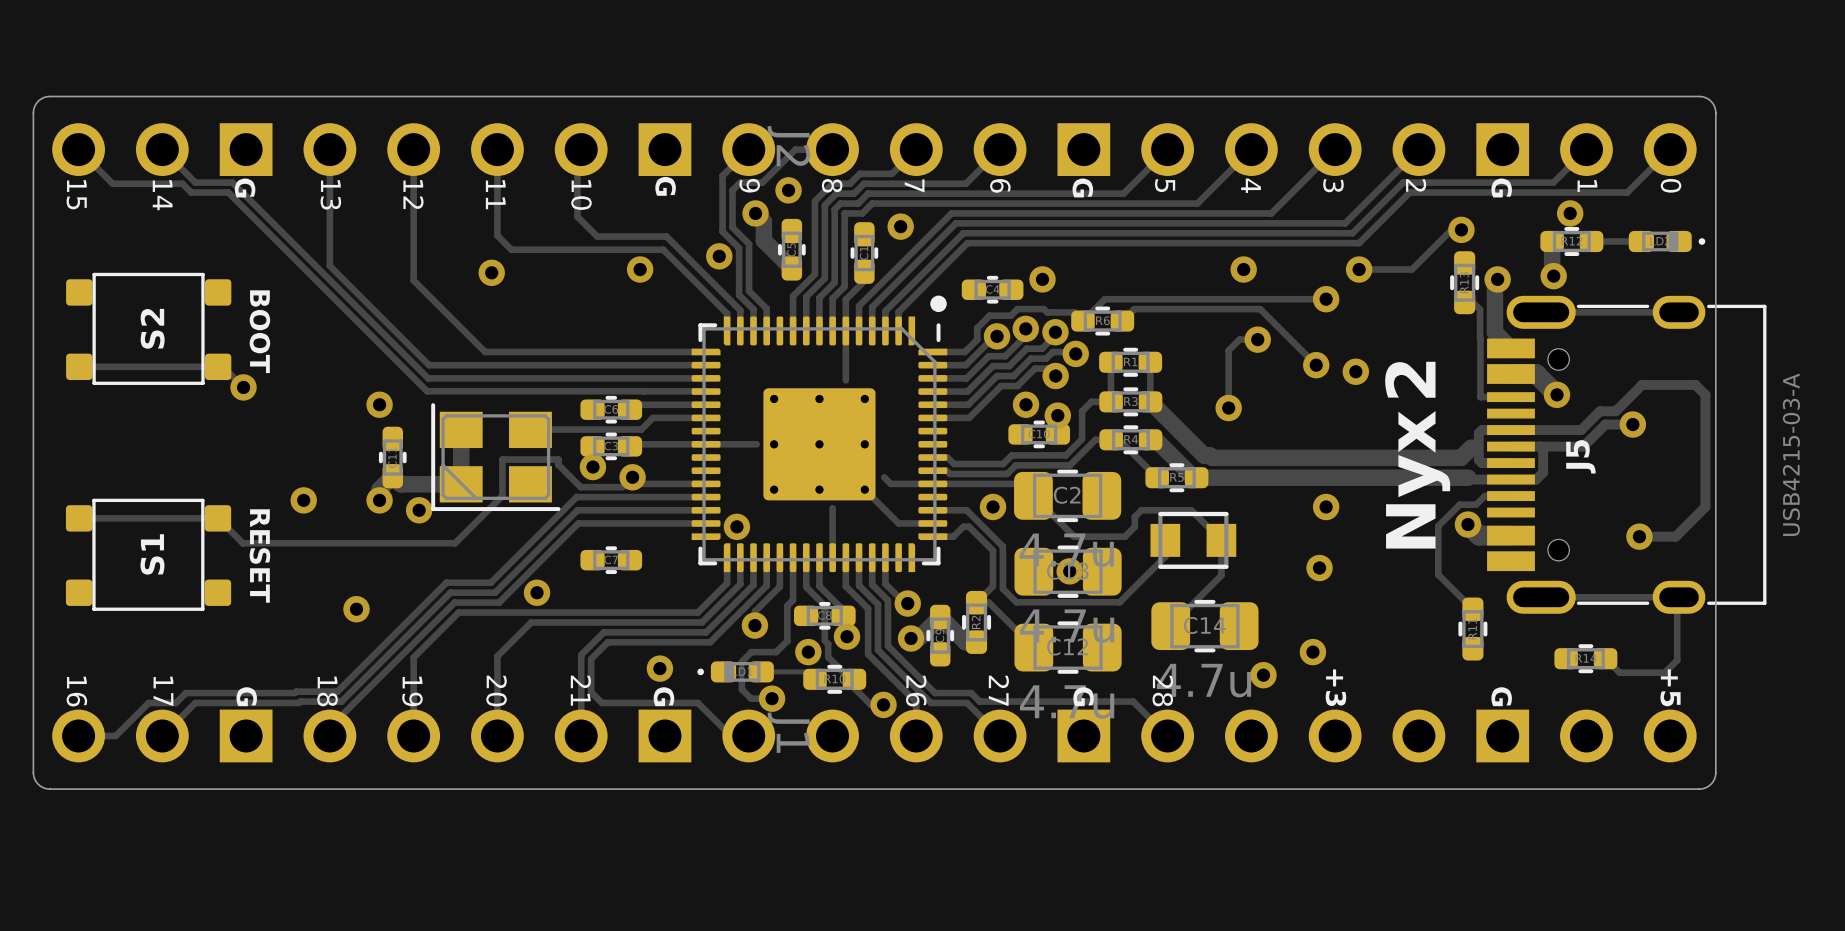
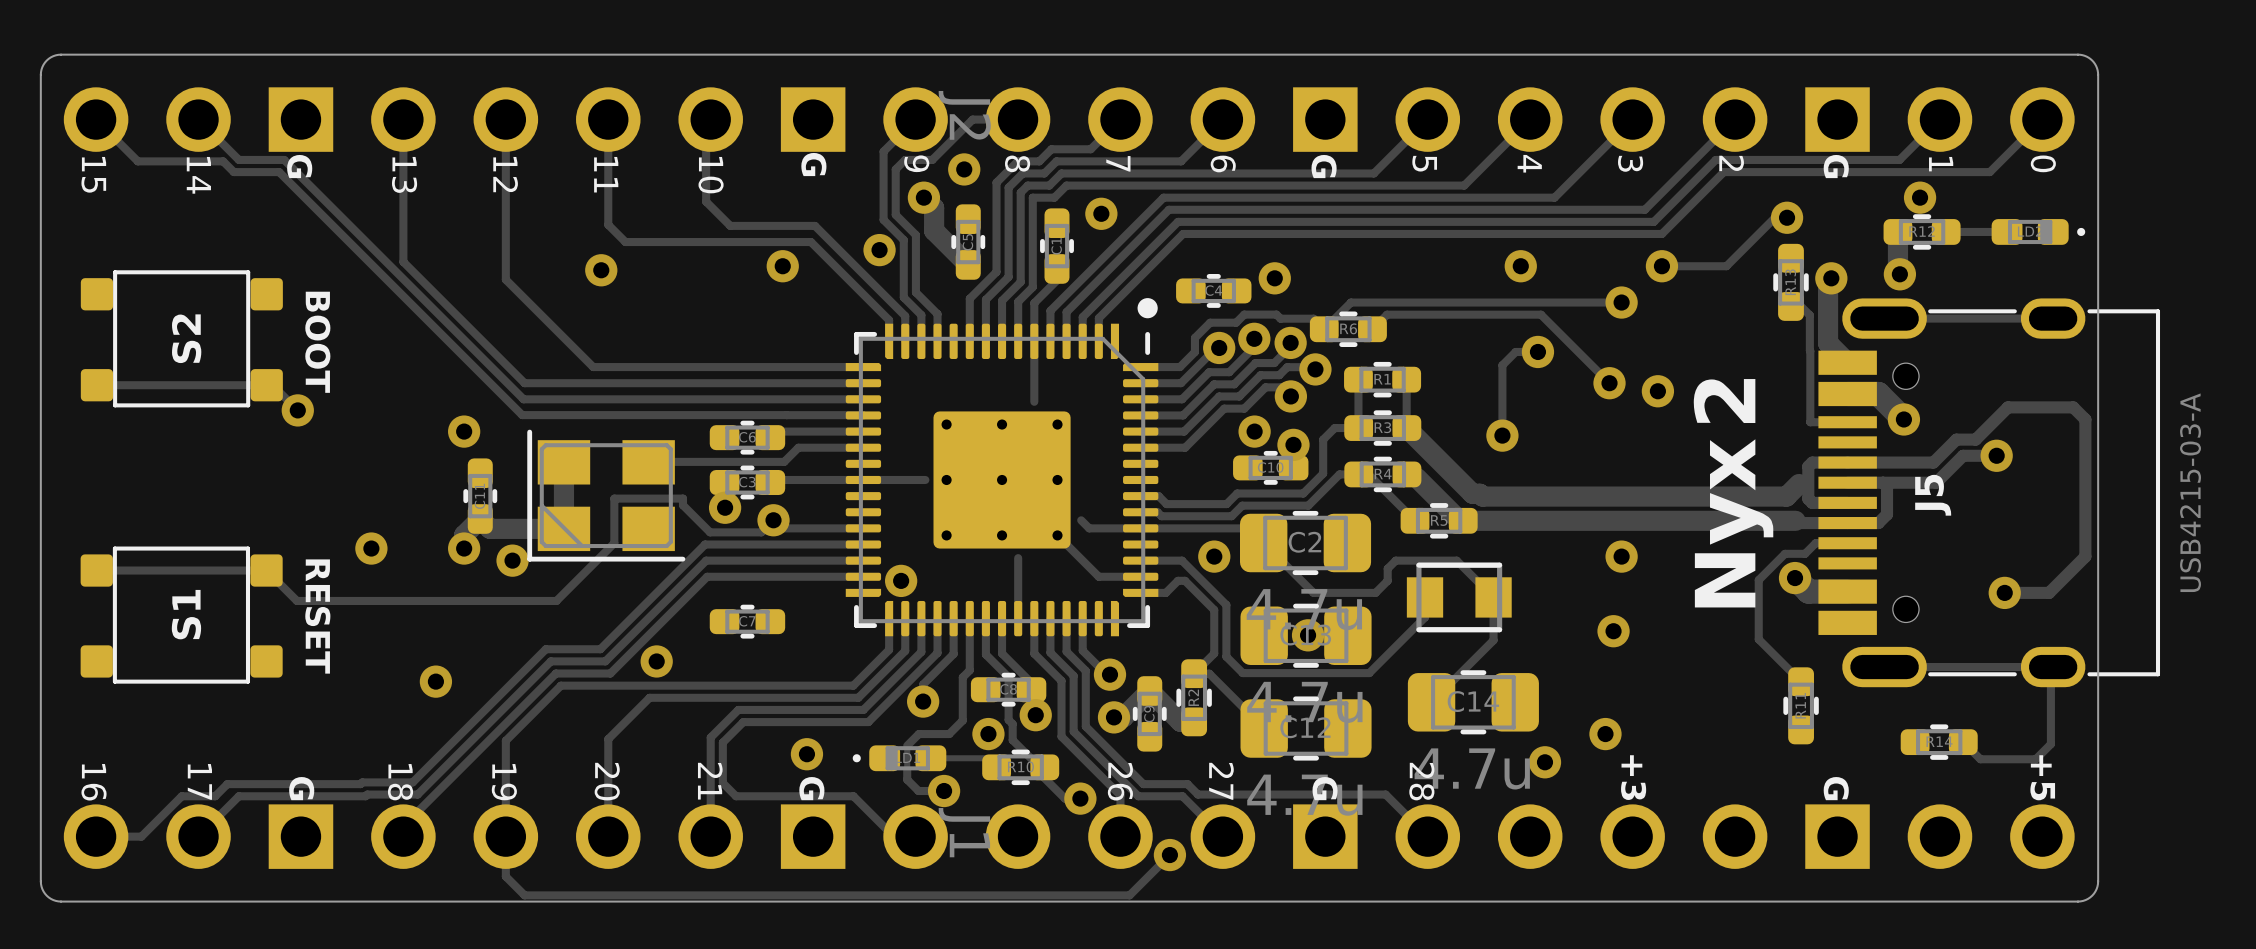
track: none -> (505, 836) (505, 876) (524, 895) (1129, 895) (1169, 855)
via: none -> (1169, 855)

